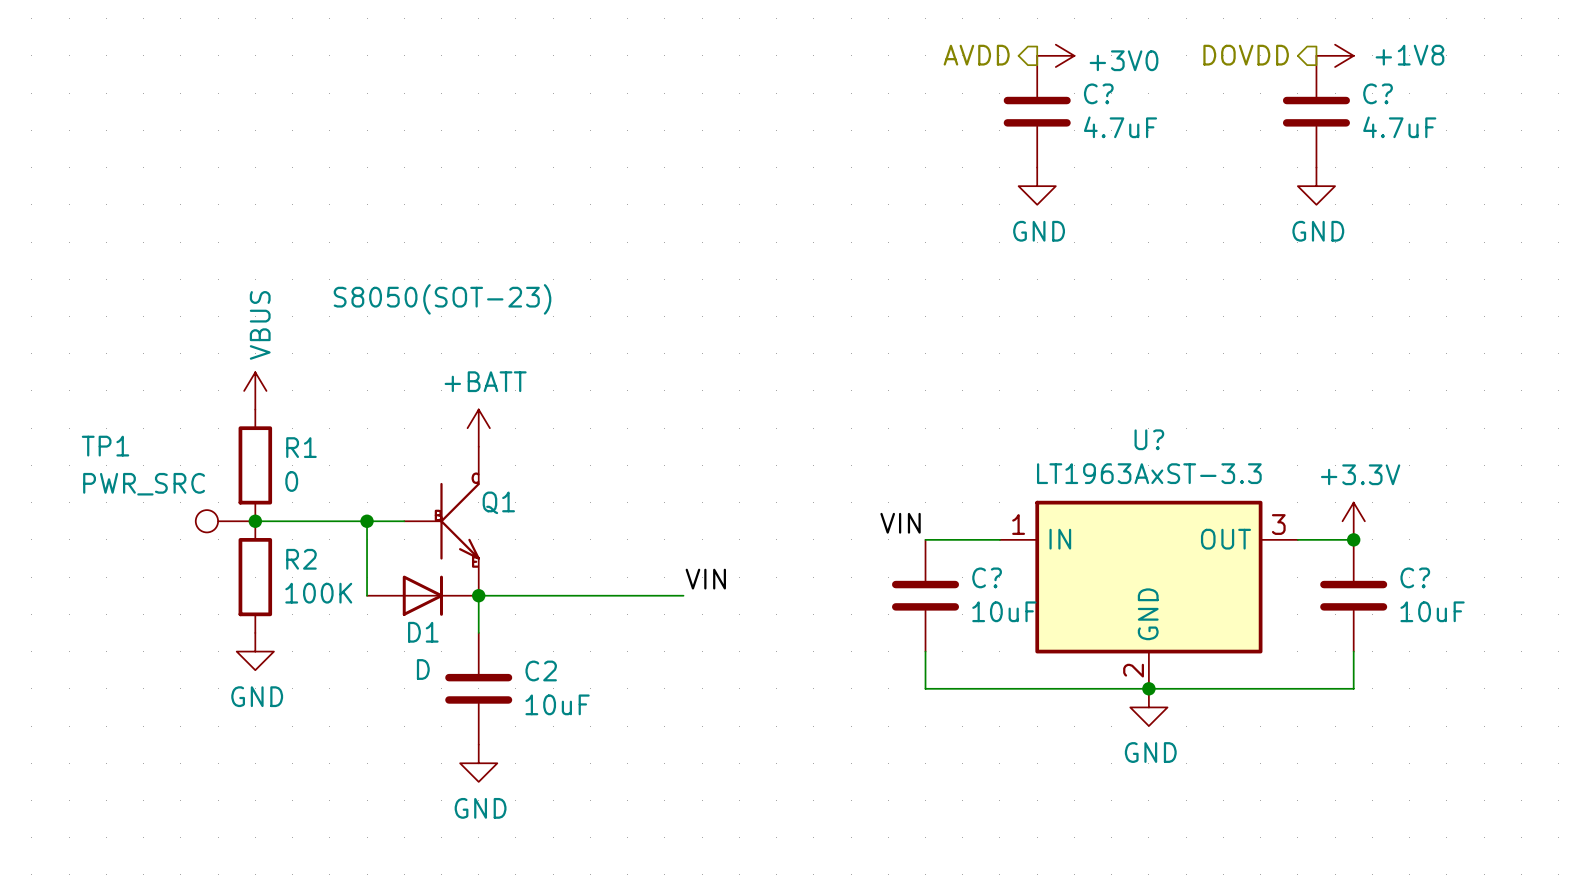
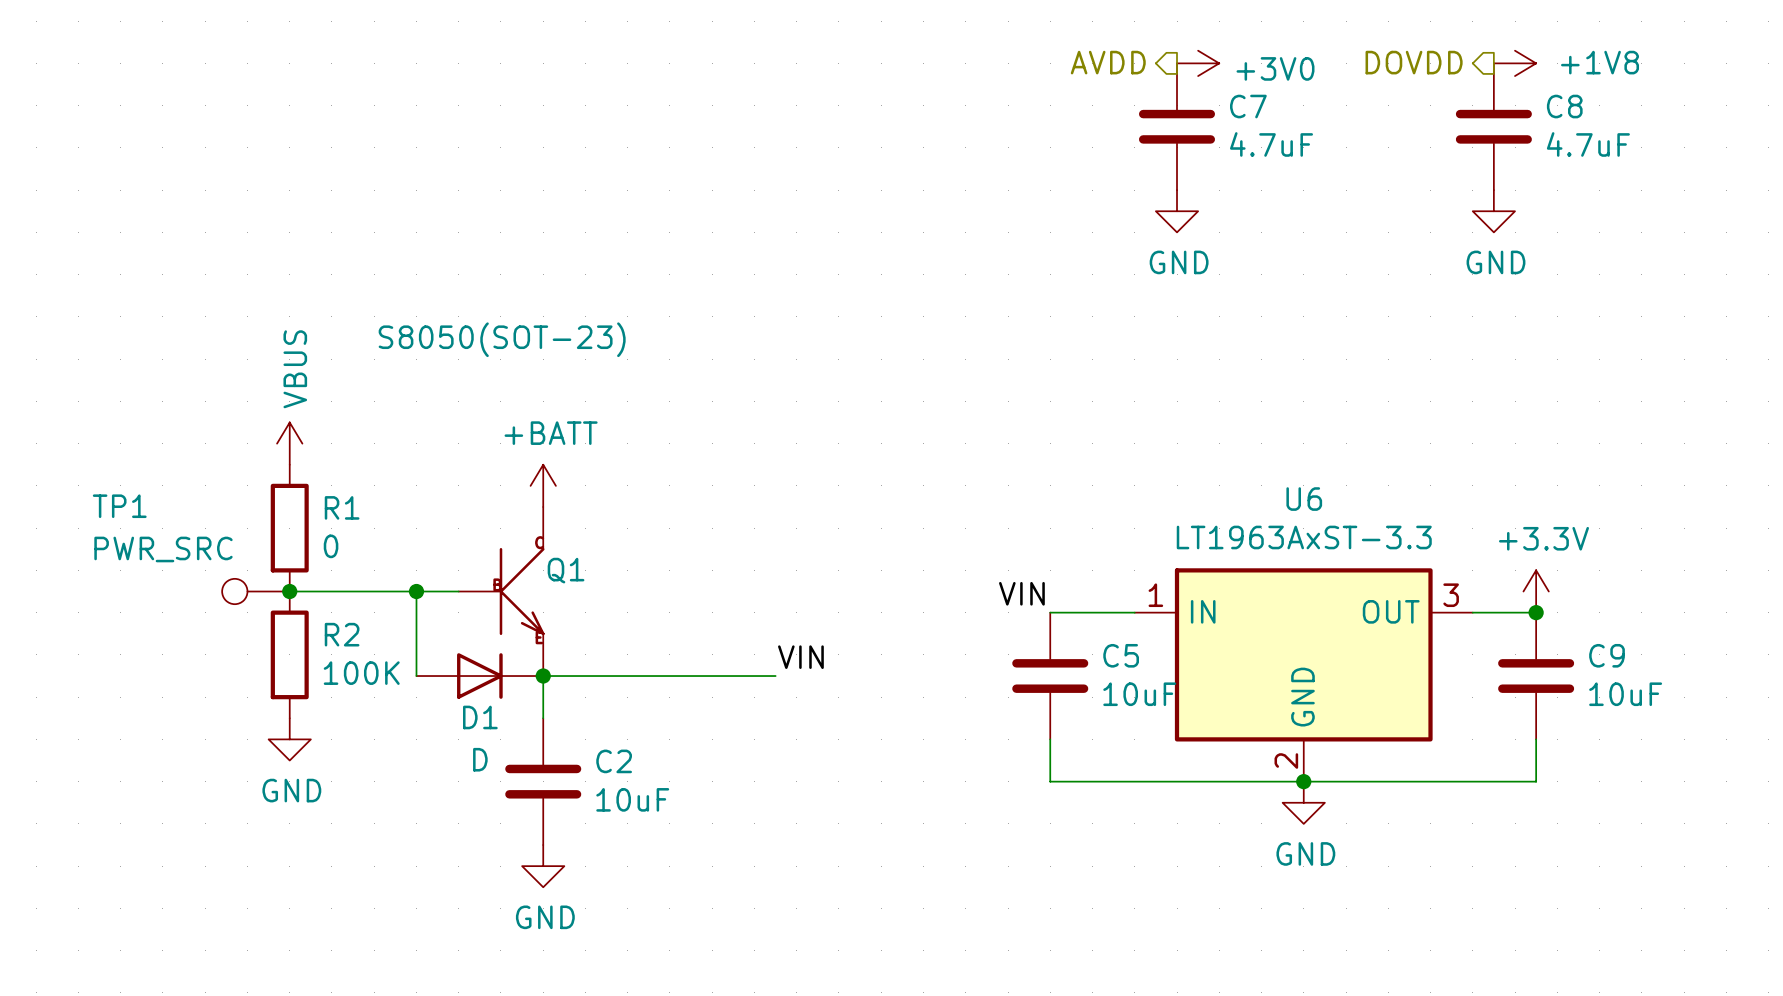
C? name: C? (1098, 93) -> C7 (1248, 106)
C? name: C? (1378, 93) -> C8 (1564, 106)
U? name: U? (1149, 439) -> U6 (1304, 499)
C? name: C? (987, 577) -> C5 (1121, 655)
C? name: C? (1415, 577) -> C9 (1607, 655)

